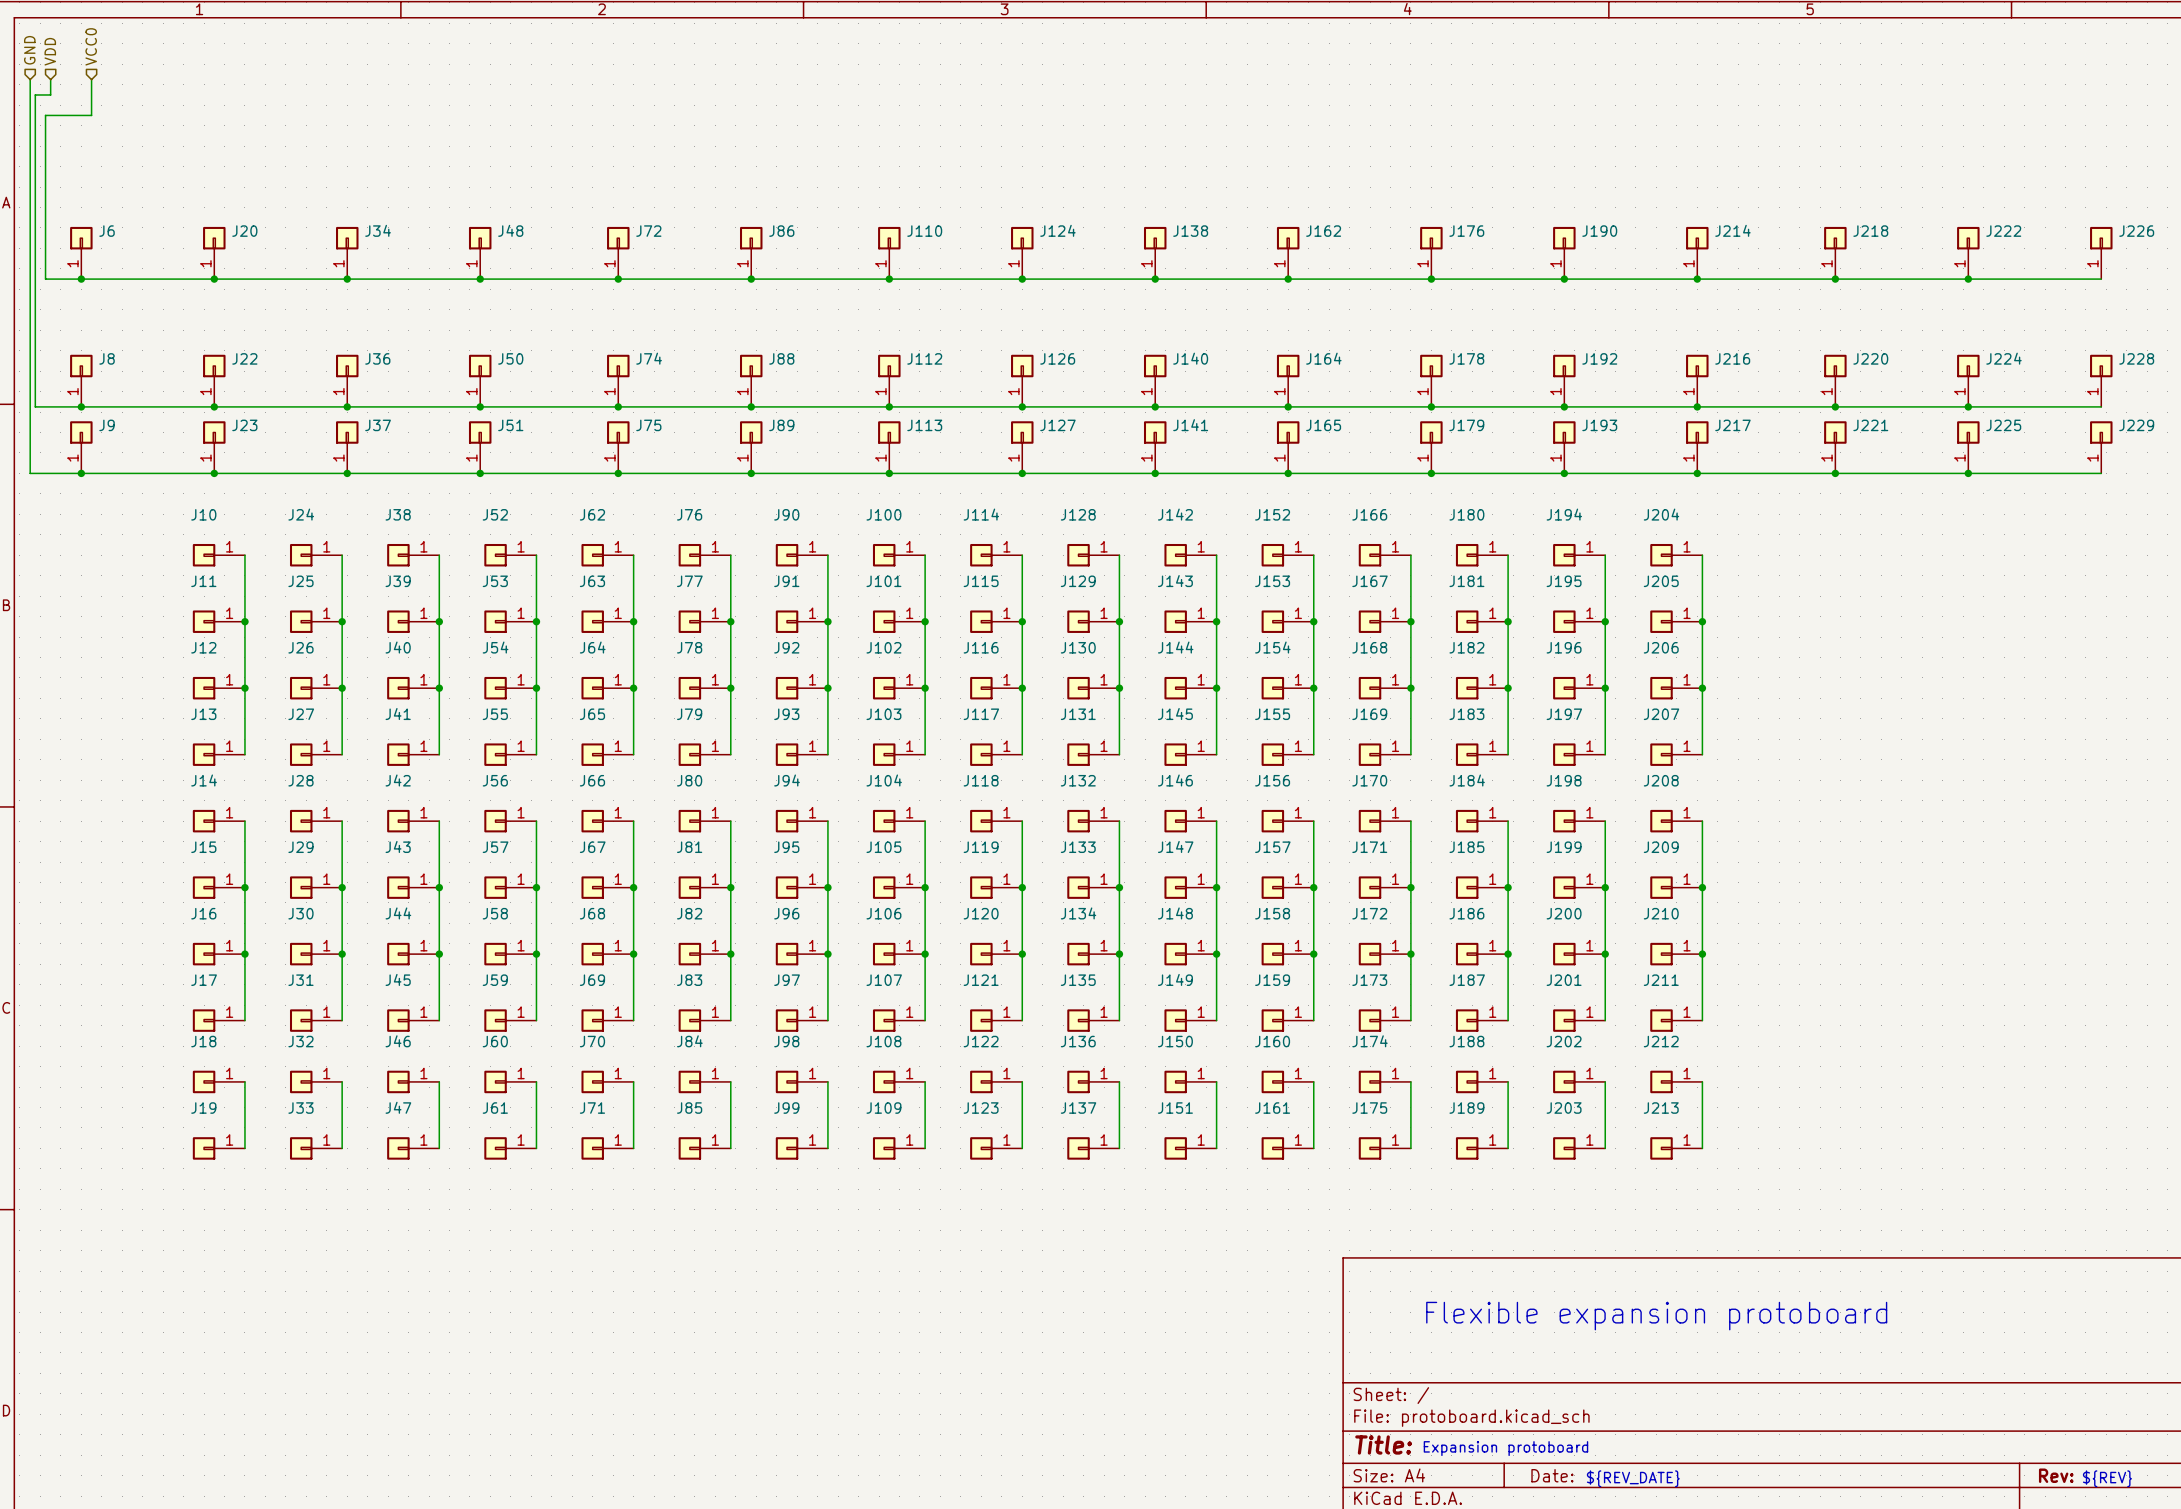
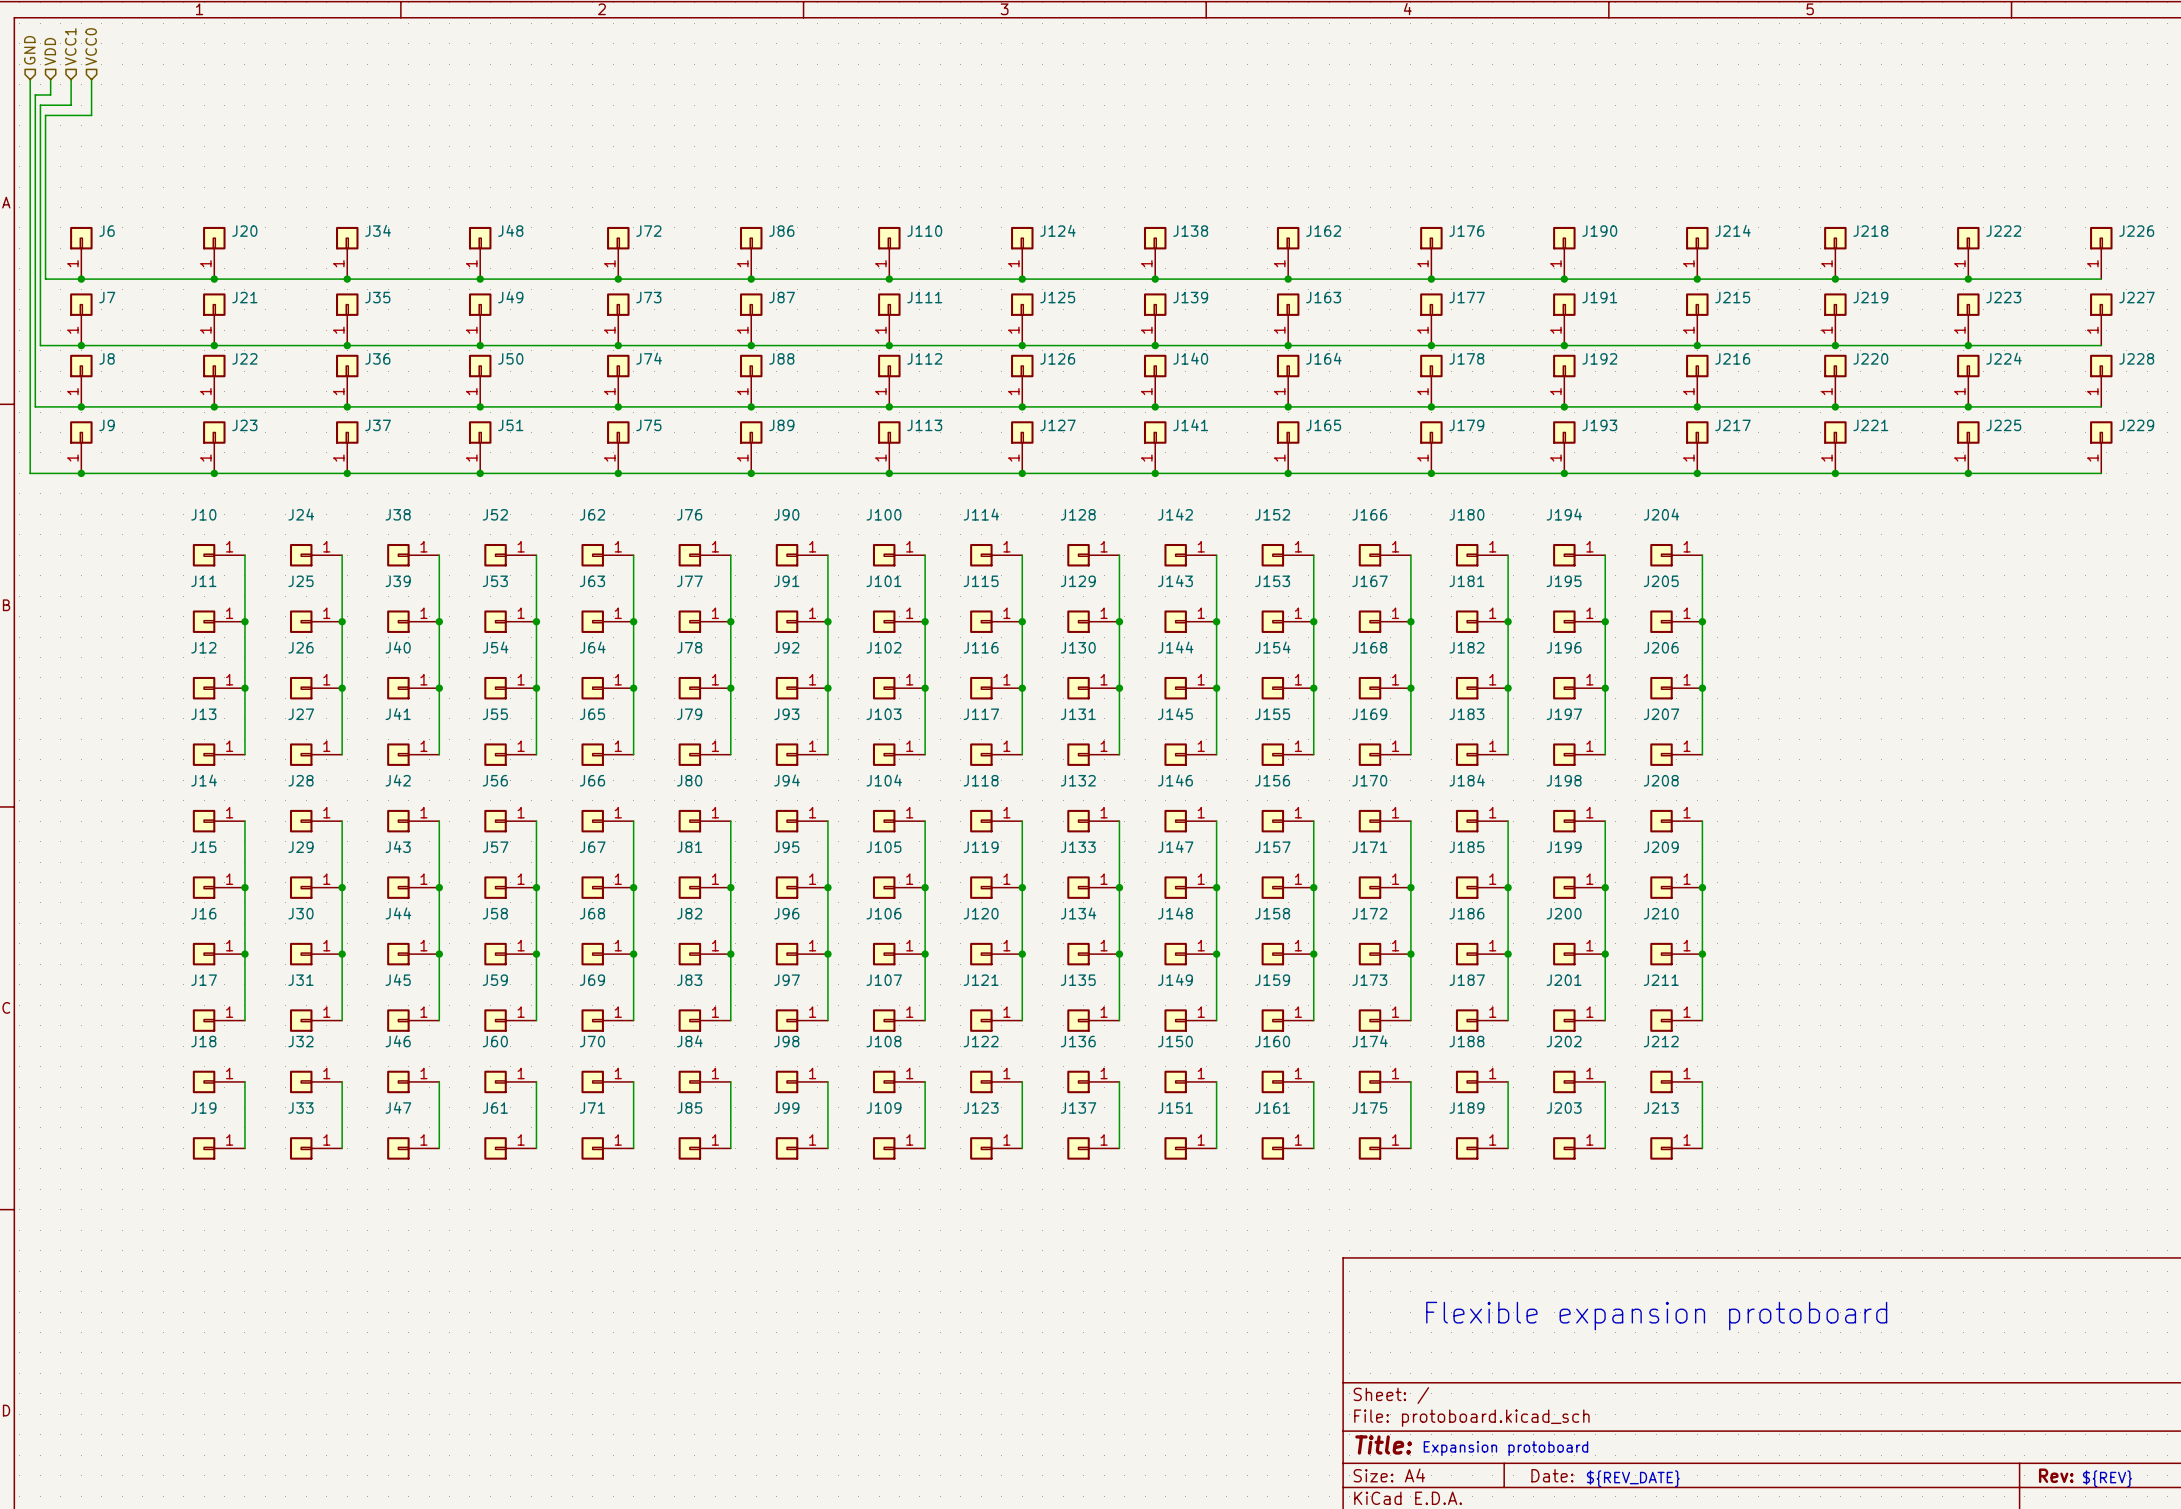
hierarchical label: none -> VCC1 (70, 46)
wire: none -> (71, 79) (71, 105) (40, 105) (40, 345) (2101, 345)
J7: none -> (81, 319)
J21: none -> (214, 319)
J35: none -> (347, 319)
J49: none -> (480, 319)
J73: none -> (618, 319)
J87: none -> (751, 319)
J111: none -> (889, 319)
J125: none -> (1022, 319)
J139: none -> (1155, 319)
J163: none -> (1288, 319)
J177: none -> (1431, 319)
J191: none -> (1564, 319)
J215: none -> (1697, 319)
J219: none -> (1835, 319)
J223: none -> (1968, 319)
J227: none -> (2101, 319)
junction: none -> (81, 345)
junction: none -> (214, 345)
junction: none -> (347, 345)
junction: none -> (480, 345)
junction: none -> (618, 345)
junction: none -> (751, 345)
junction: none -> (889, 345)
junction: none -> (1022, 345)
junction: none -> (1155, 345)
junction: none -> (1288, 345)
junction: none -> (1431, 345)
junction: none -> (1564, 345)
junction: none -> (1697, 345)
junction: none -> (1835, 345)
junction: none -> (1968, 345)

